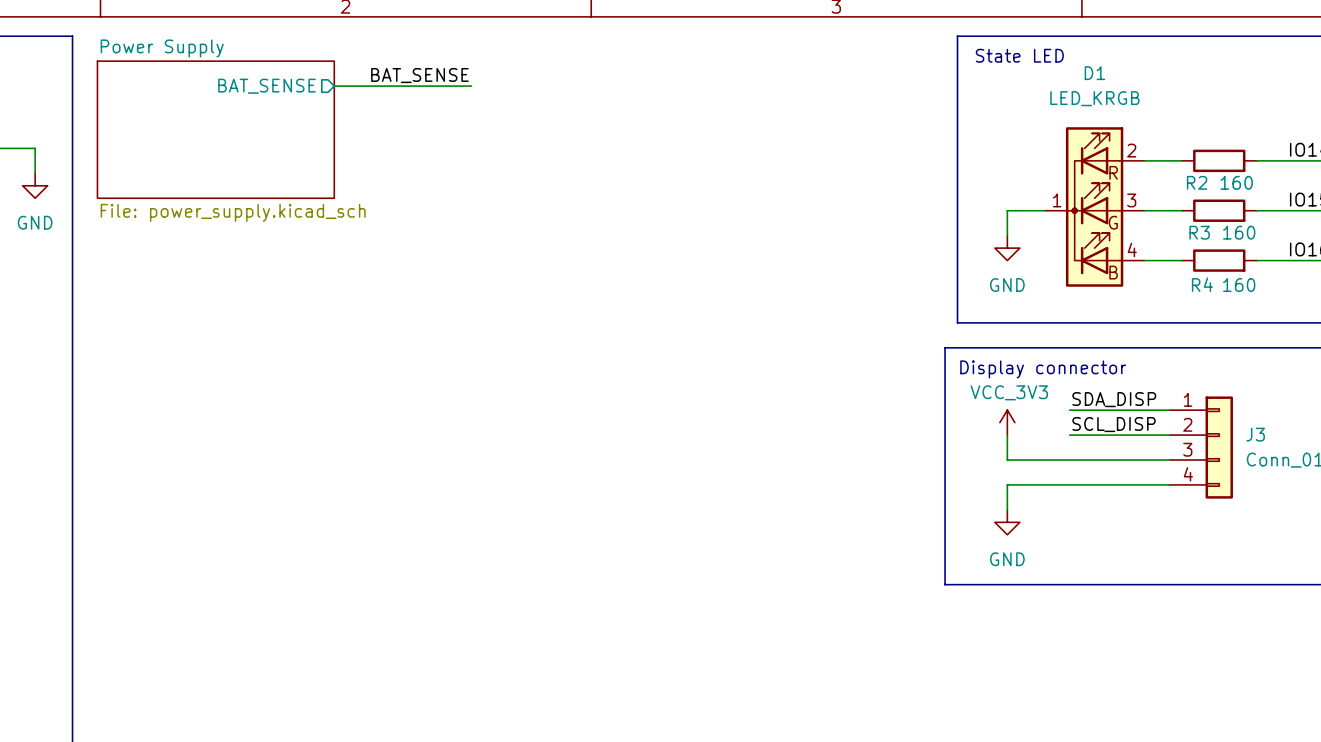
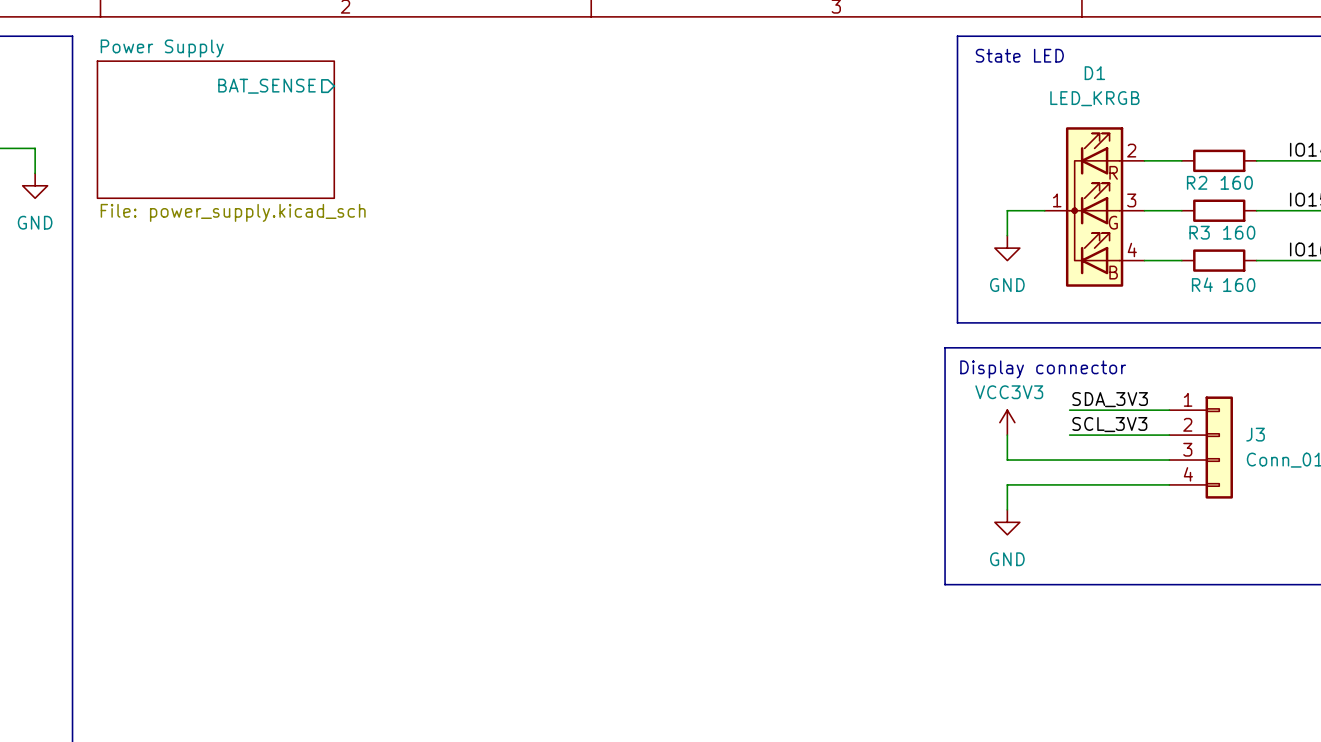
label: BAT_SENSE (419, 75) -> none
wire: (334, 86) (471, 86) -> none
label: SDA_DISP (1114, 399) -> SDA_3V3 (1110, 399)
power symbol: VCC_3V3 (1007, 422) -> VCC3V3 (1007, 422)
label: SCL_DISP (1113, 424) -> SCL_3V3 (1109, 424)

